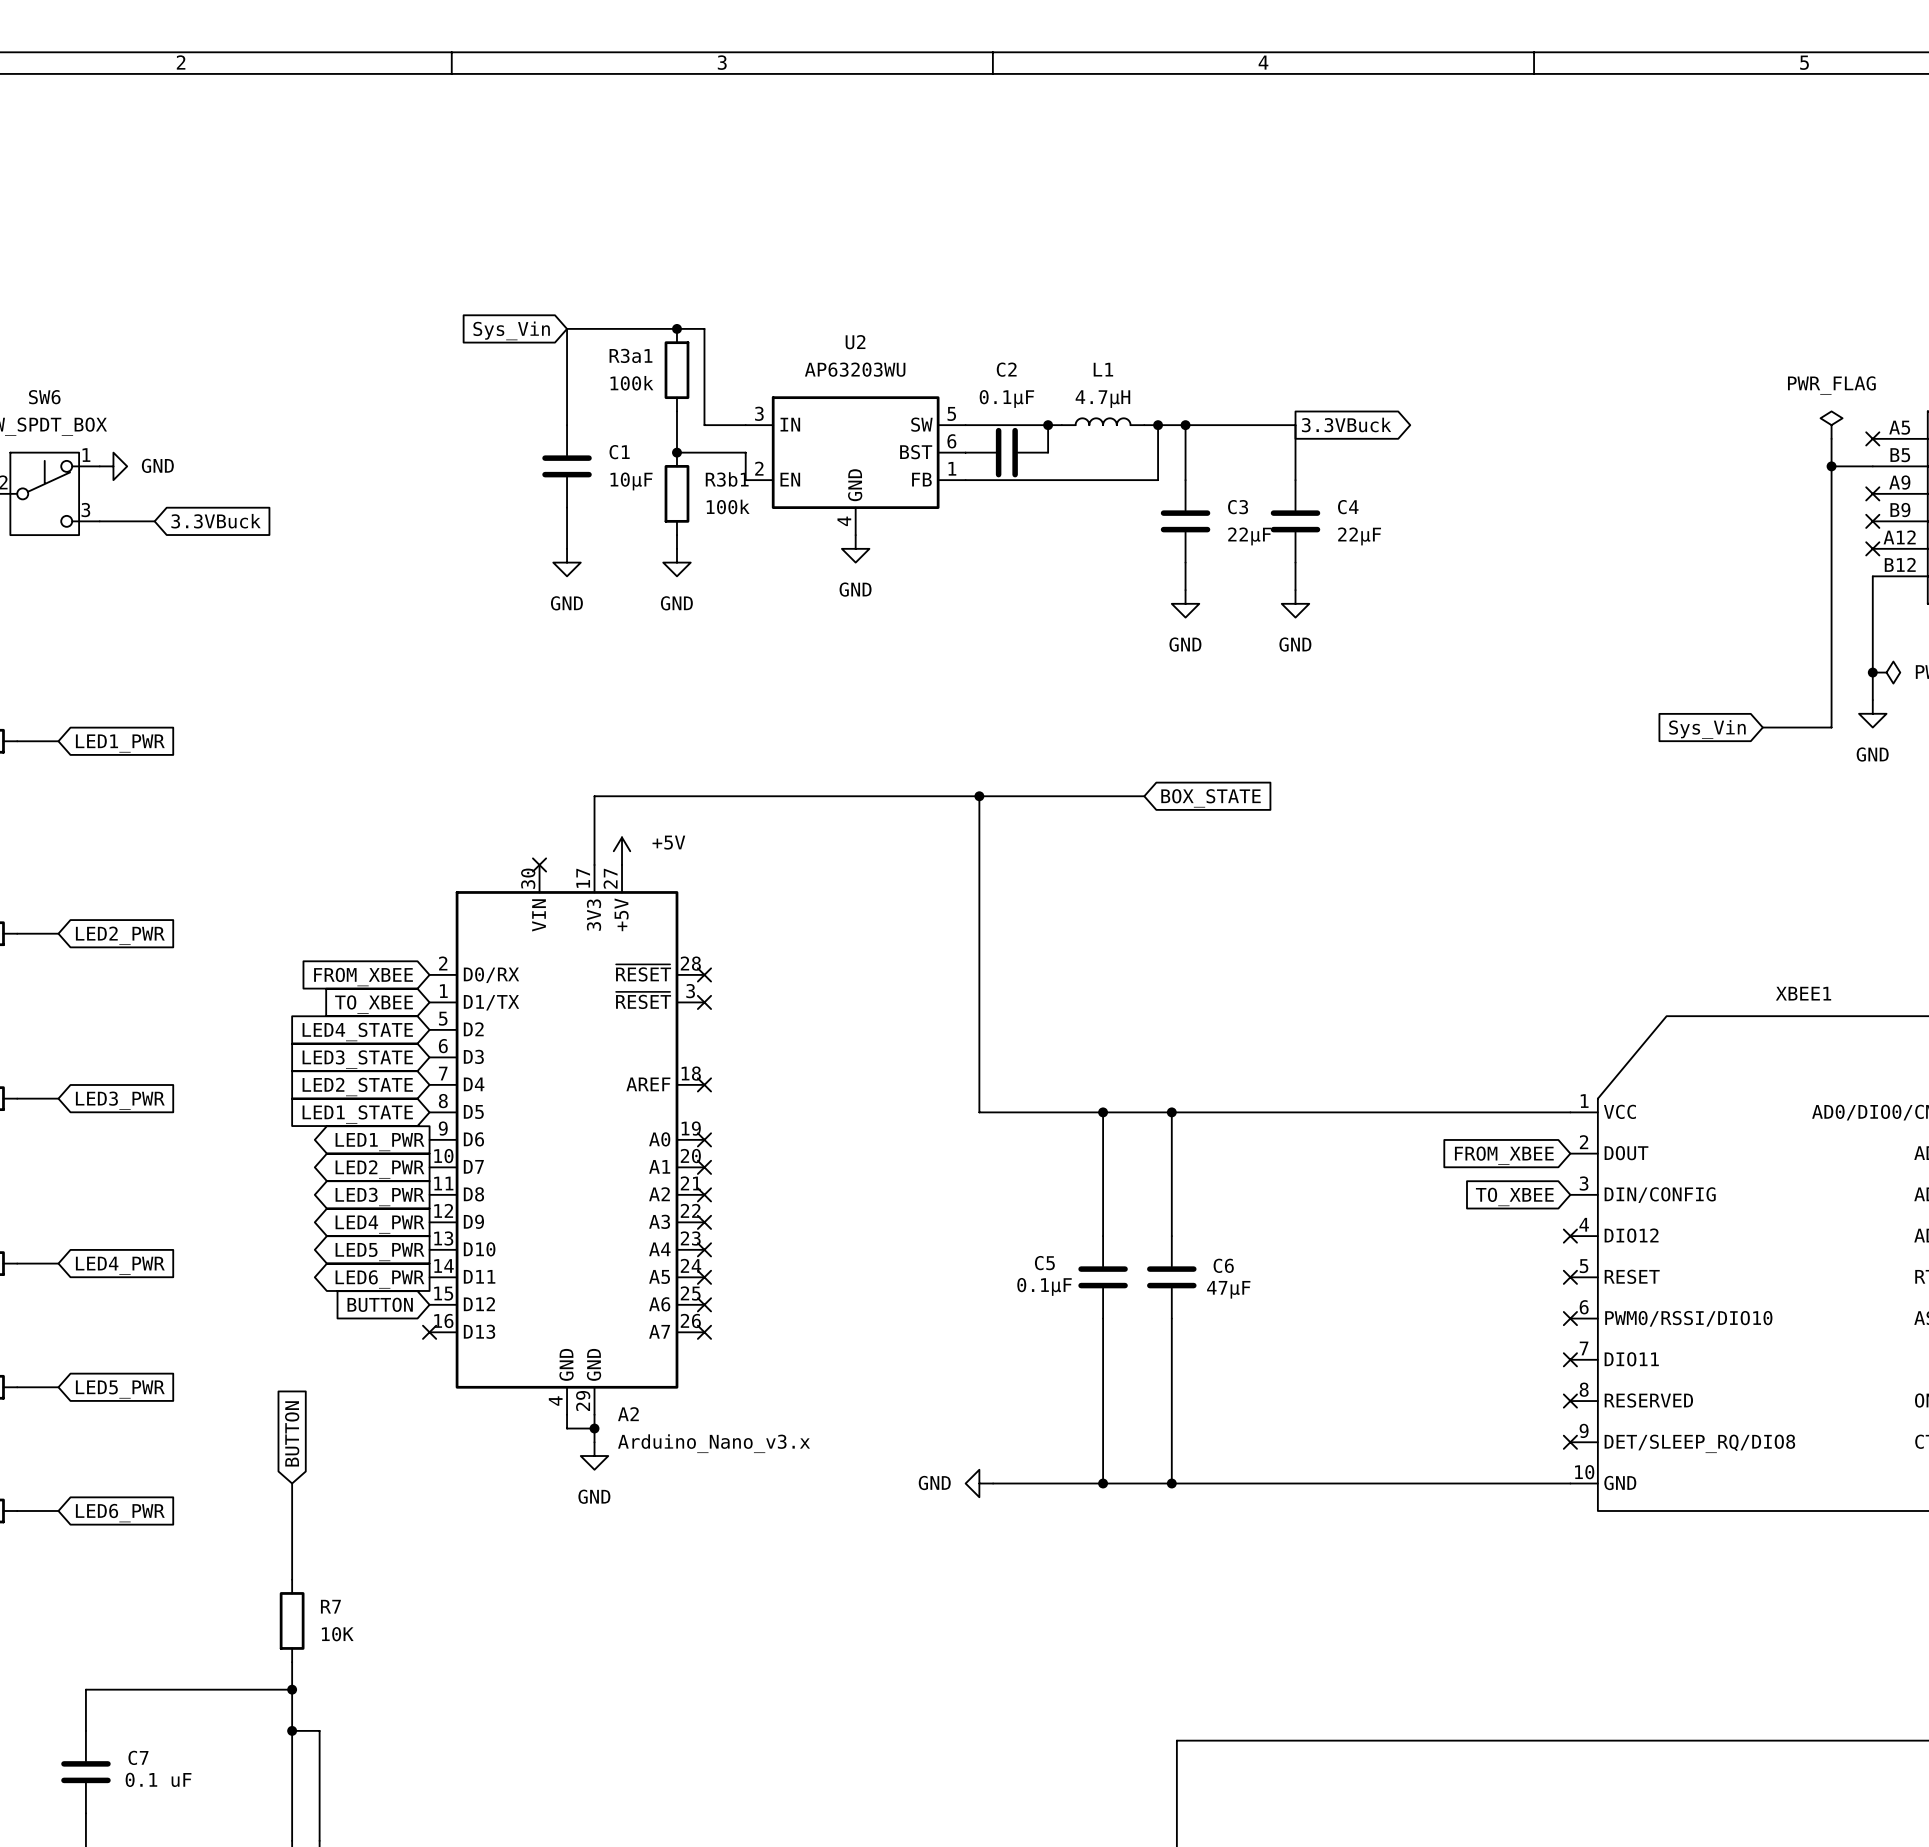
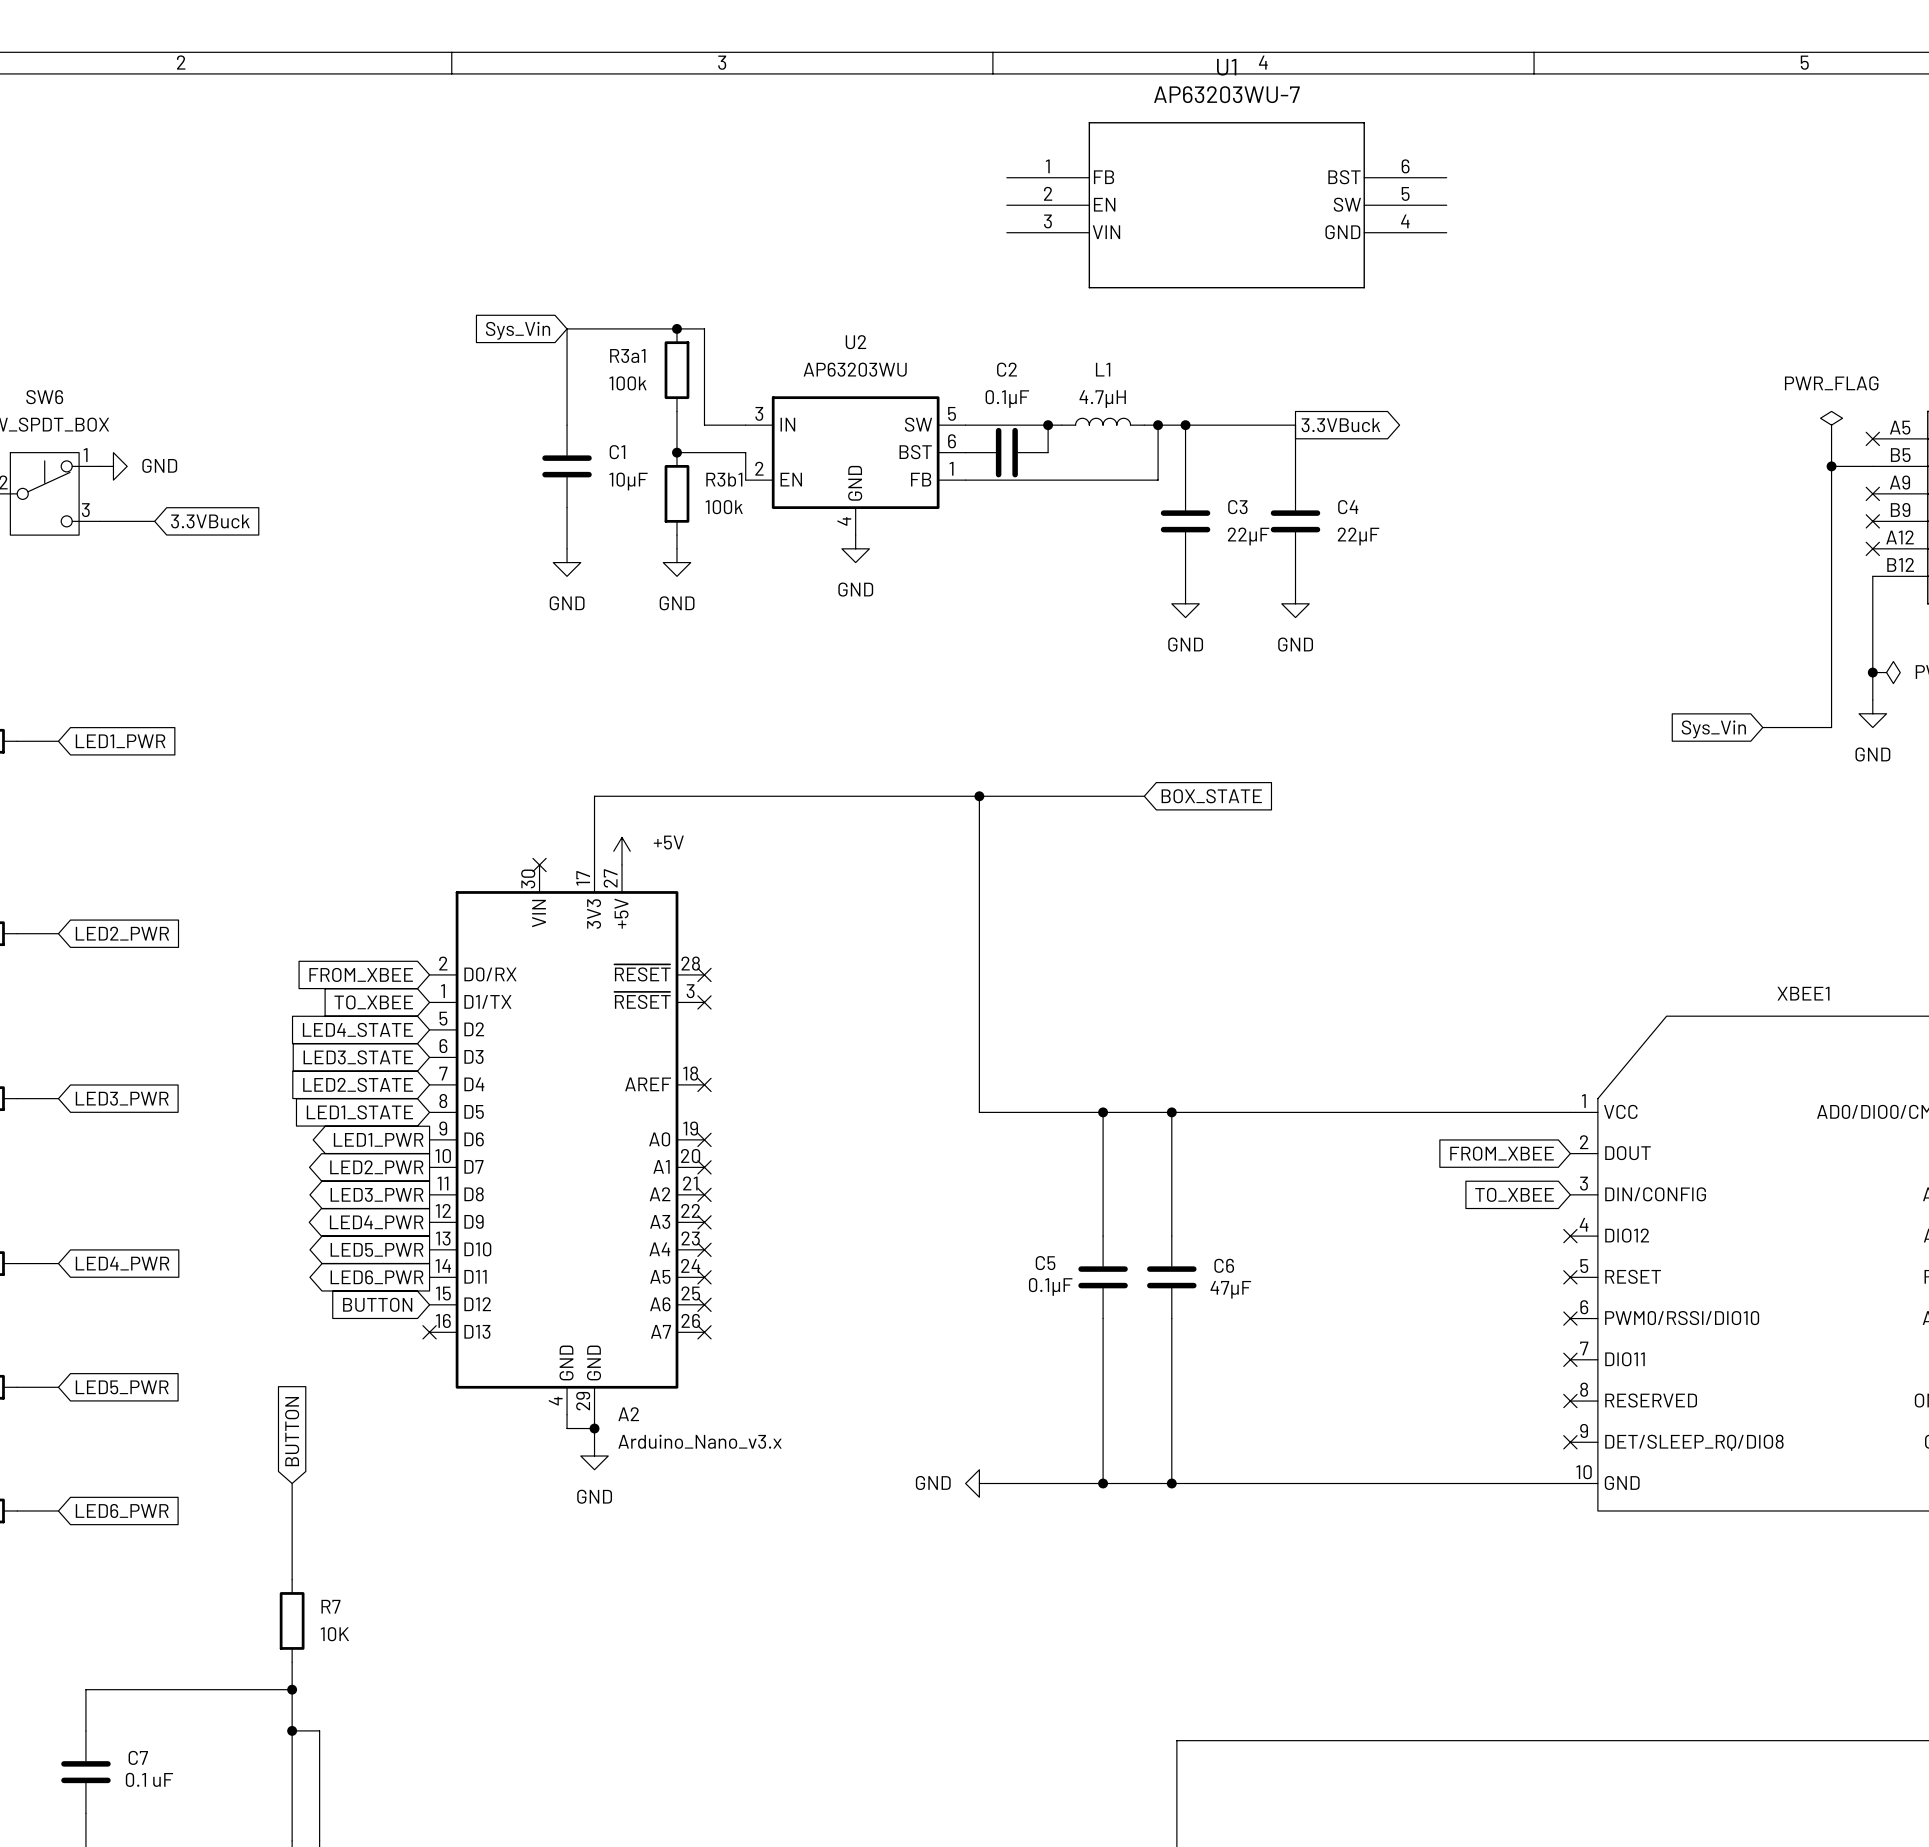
U1: none -> AP63203WU-7 (1226, 205)

